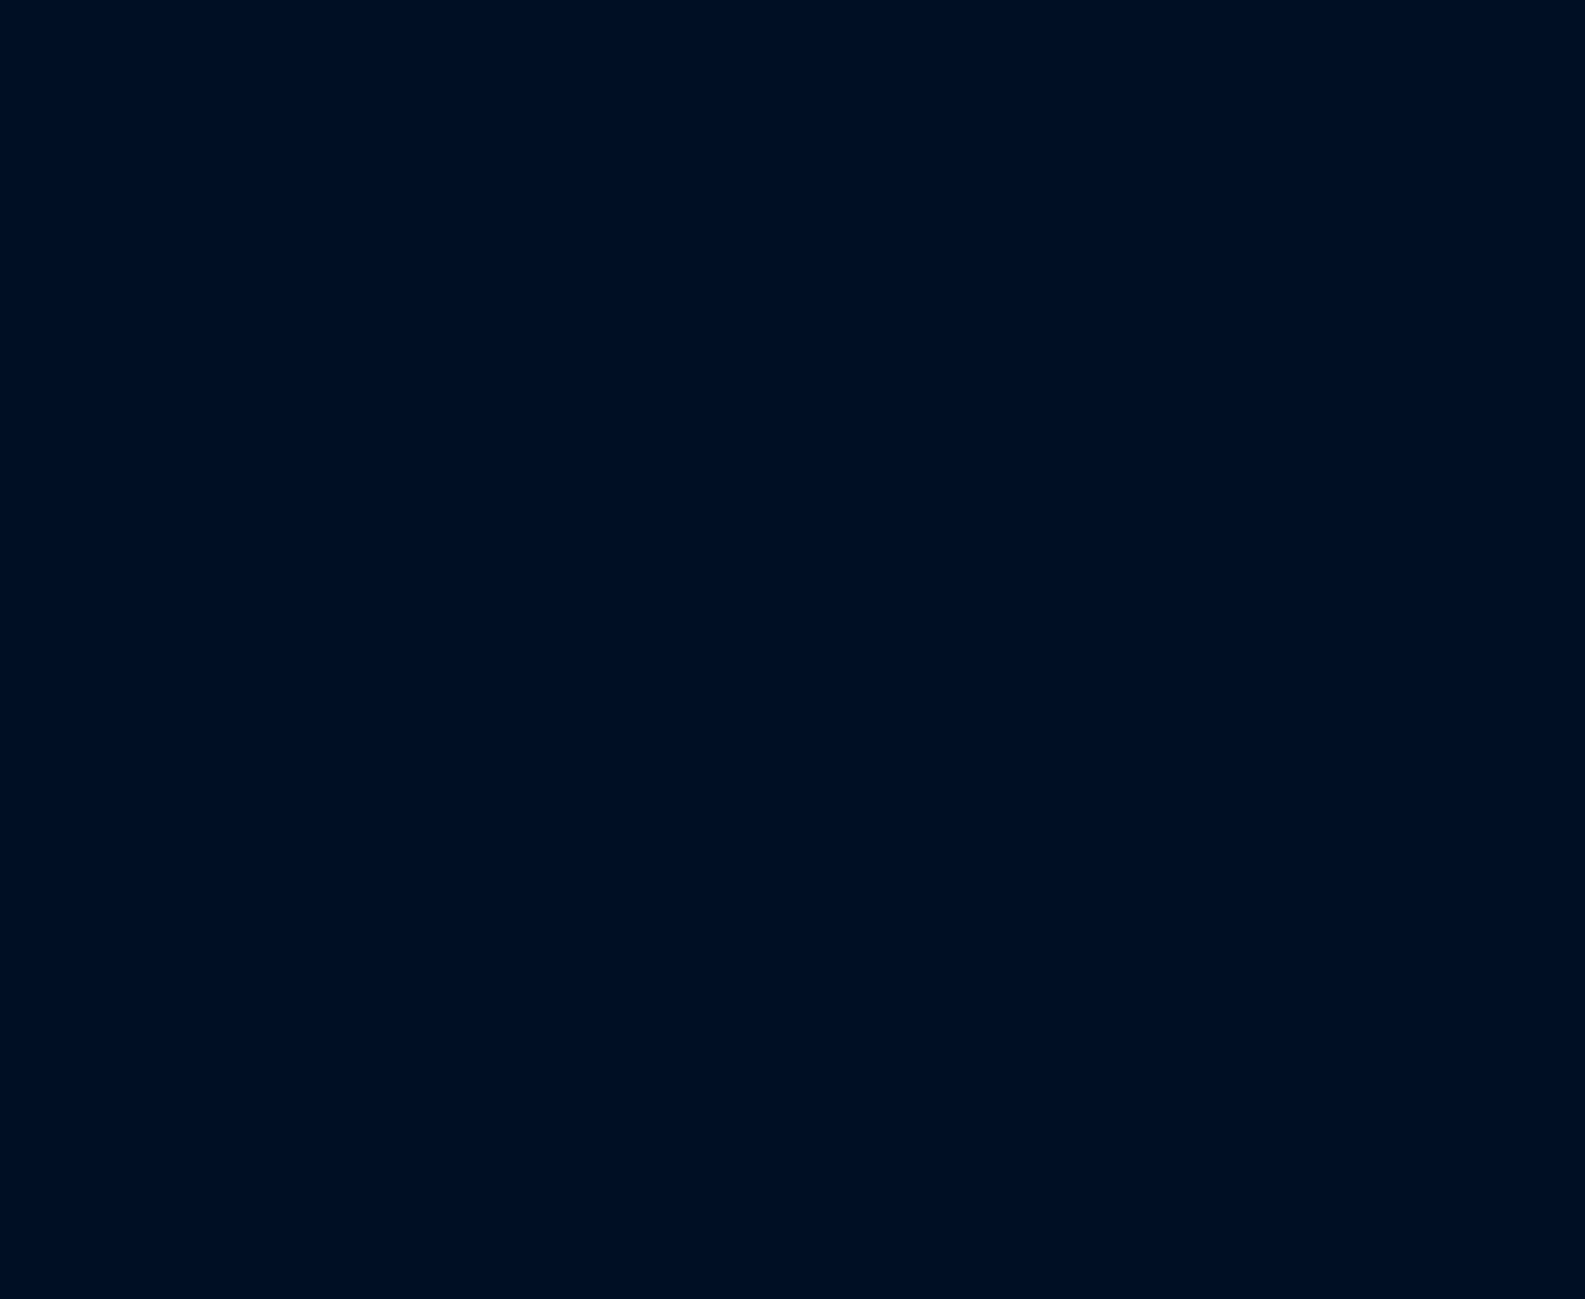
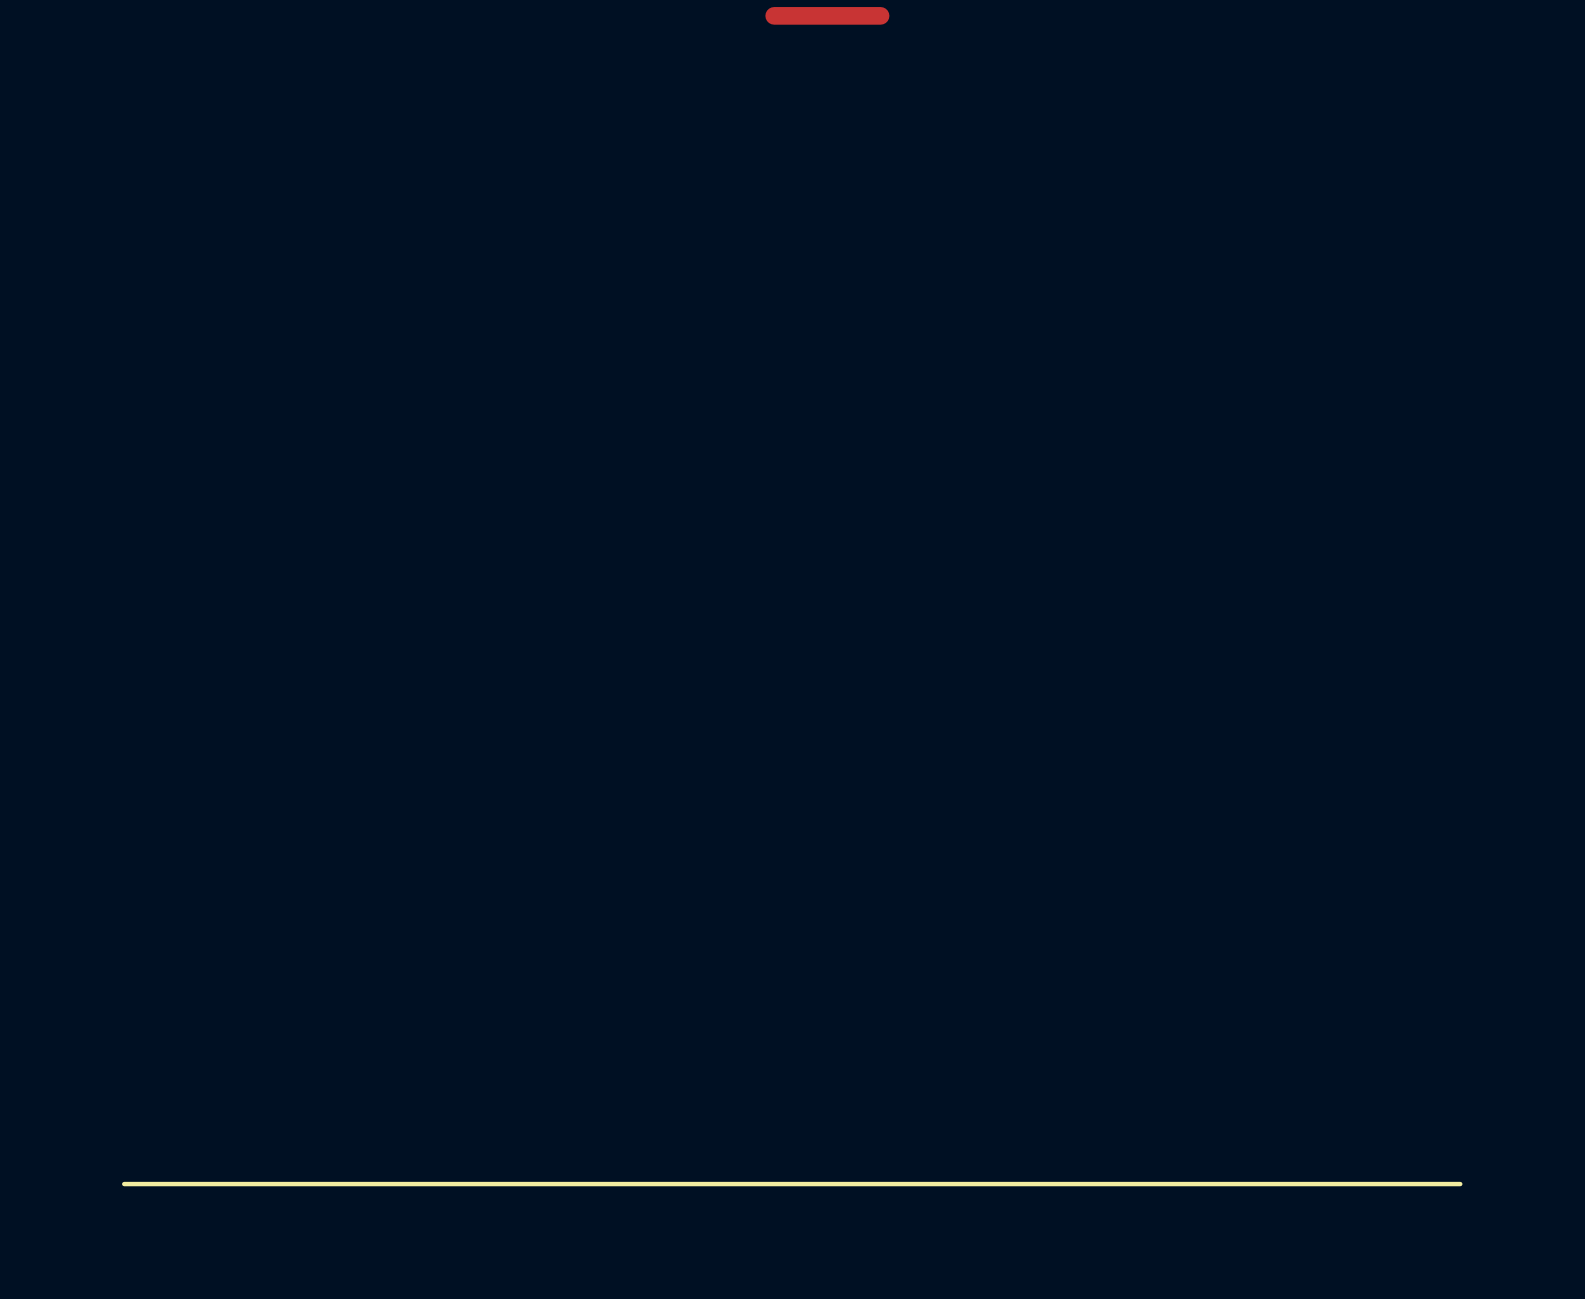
track: none -> (774, 15) (880, 15)
line: none -> (124, 1184) (1460, 1184)

